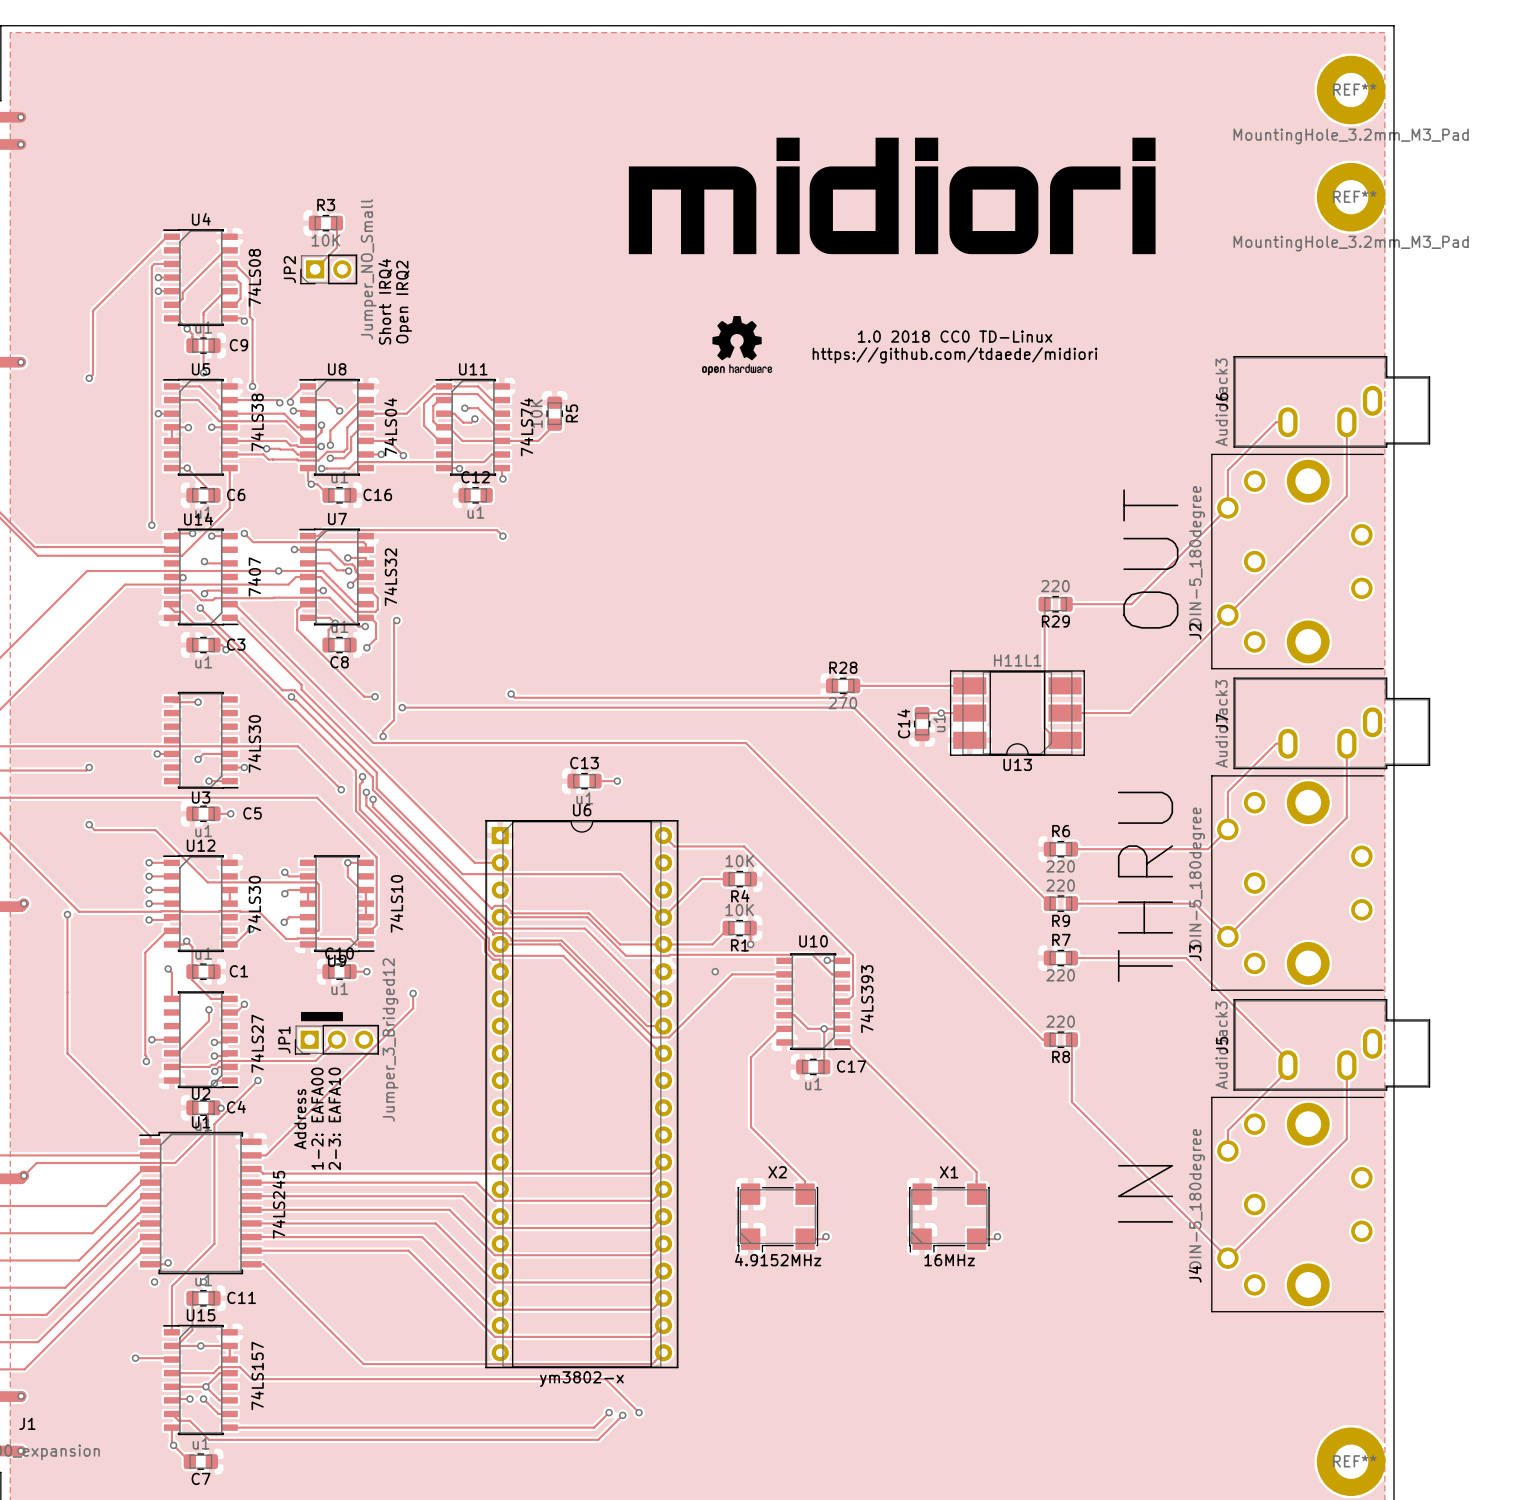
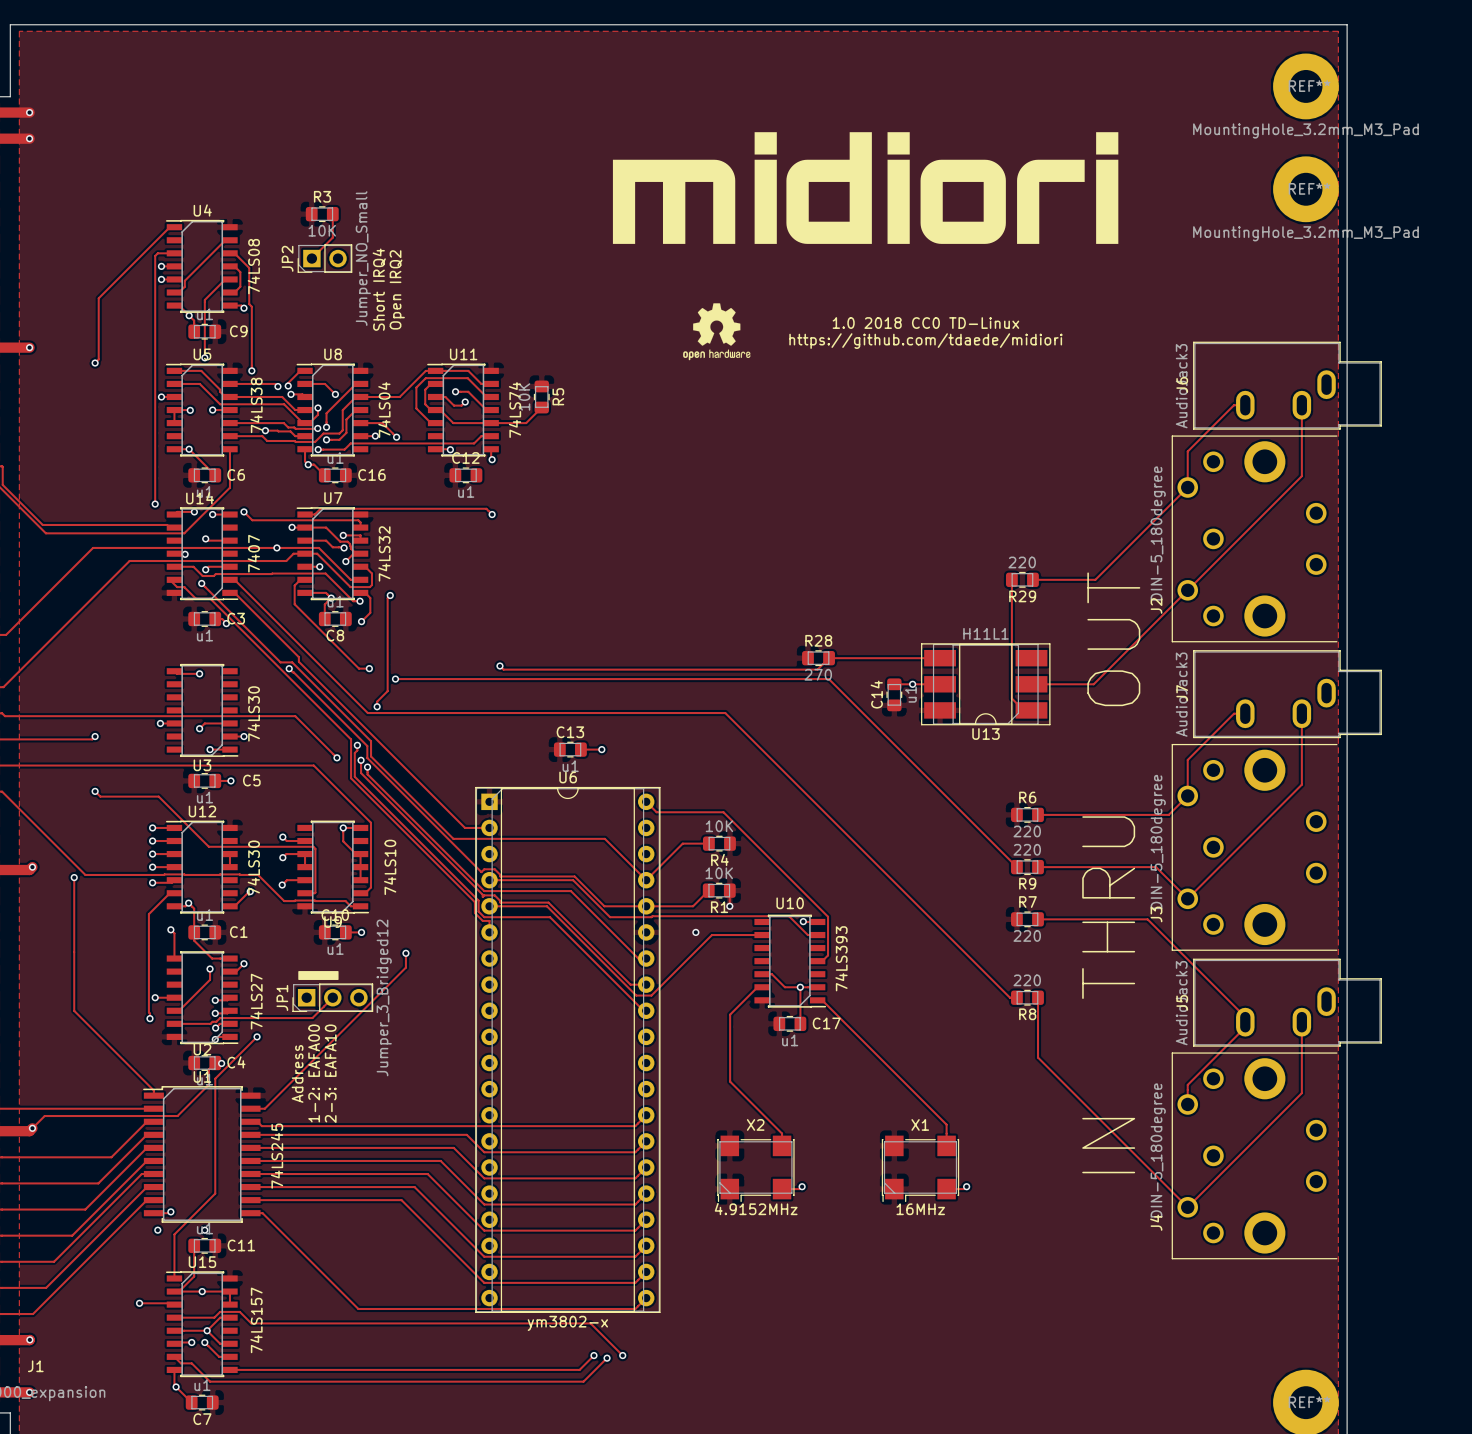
text position: OUT (1150, 559) -> OUT (1113, 639)
text position: THRU (1145, 886) -> THRU (1108, 907)

